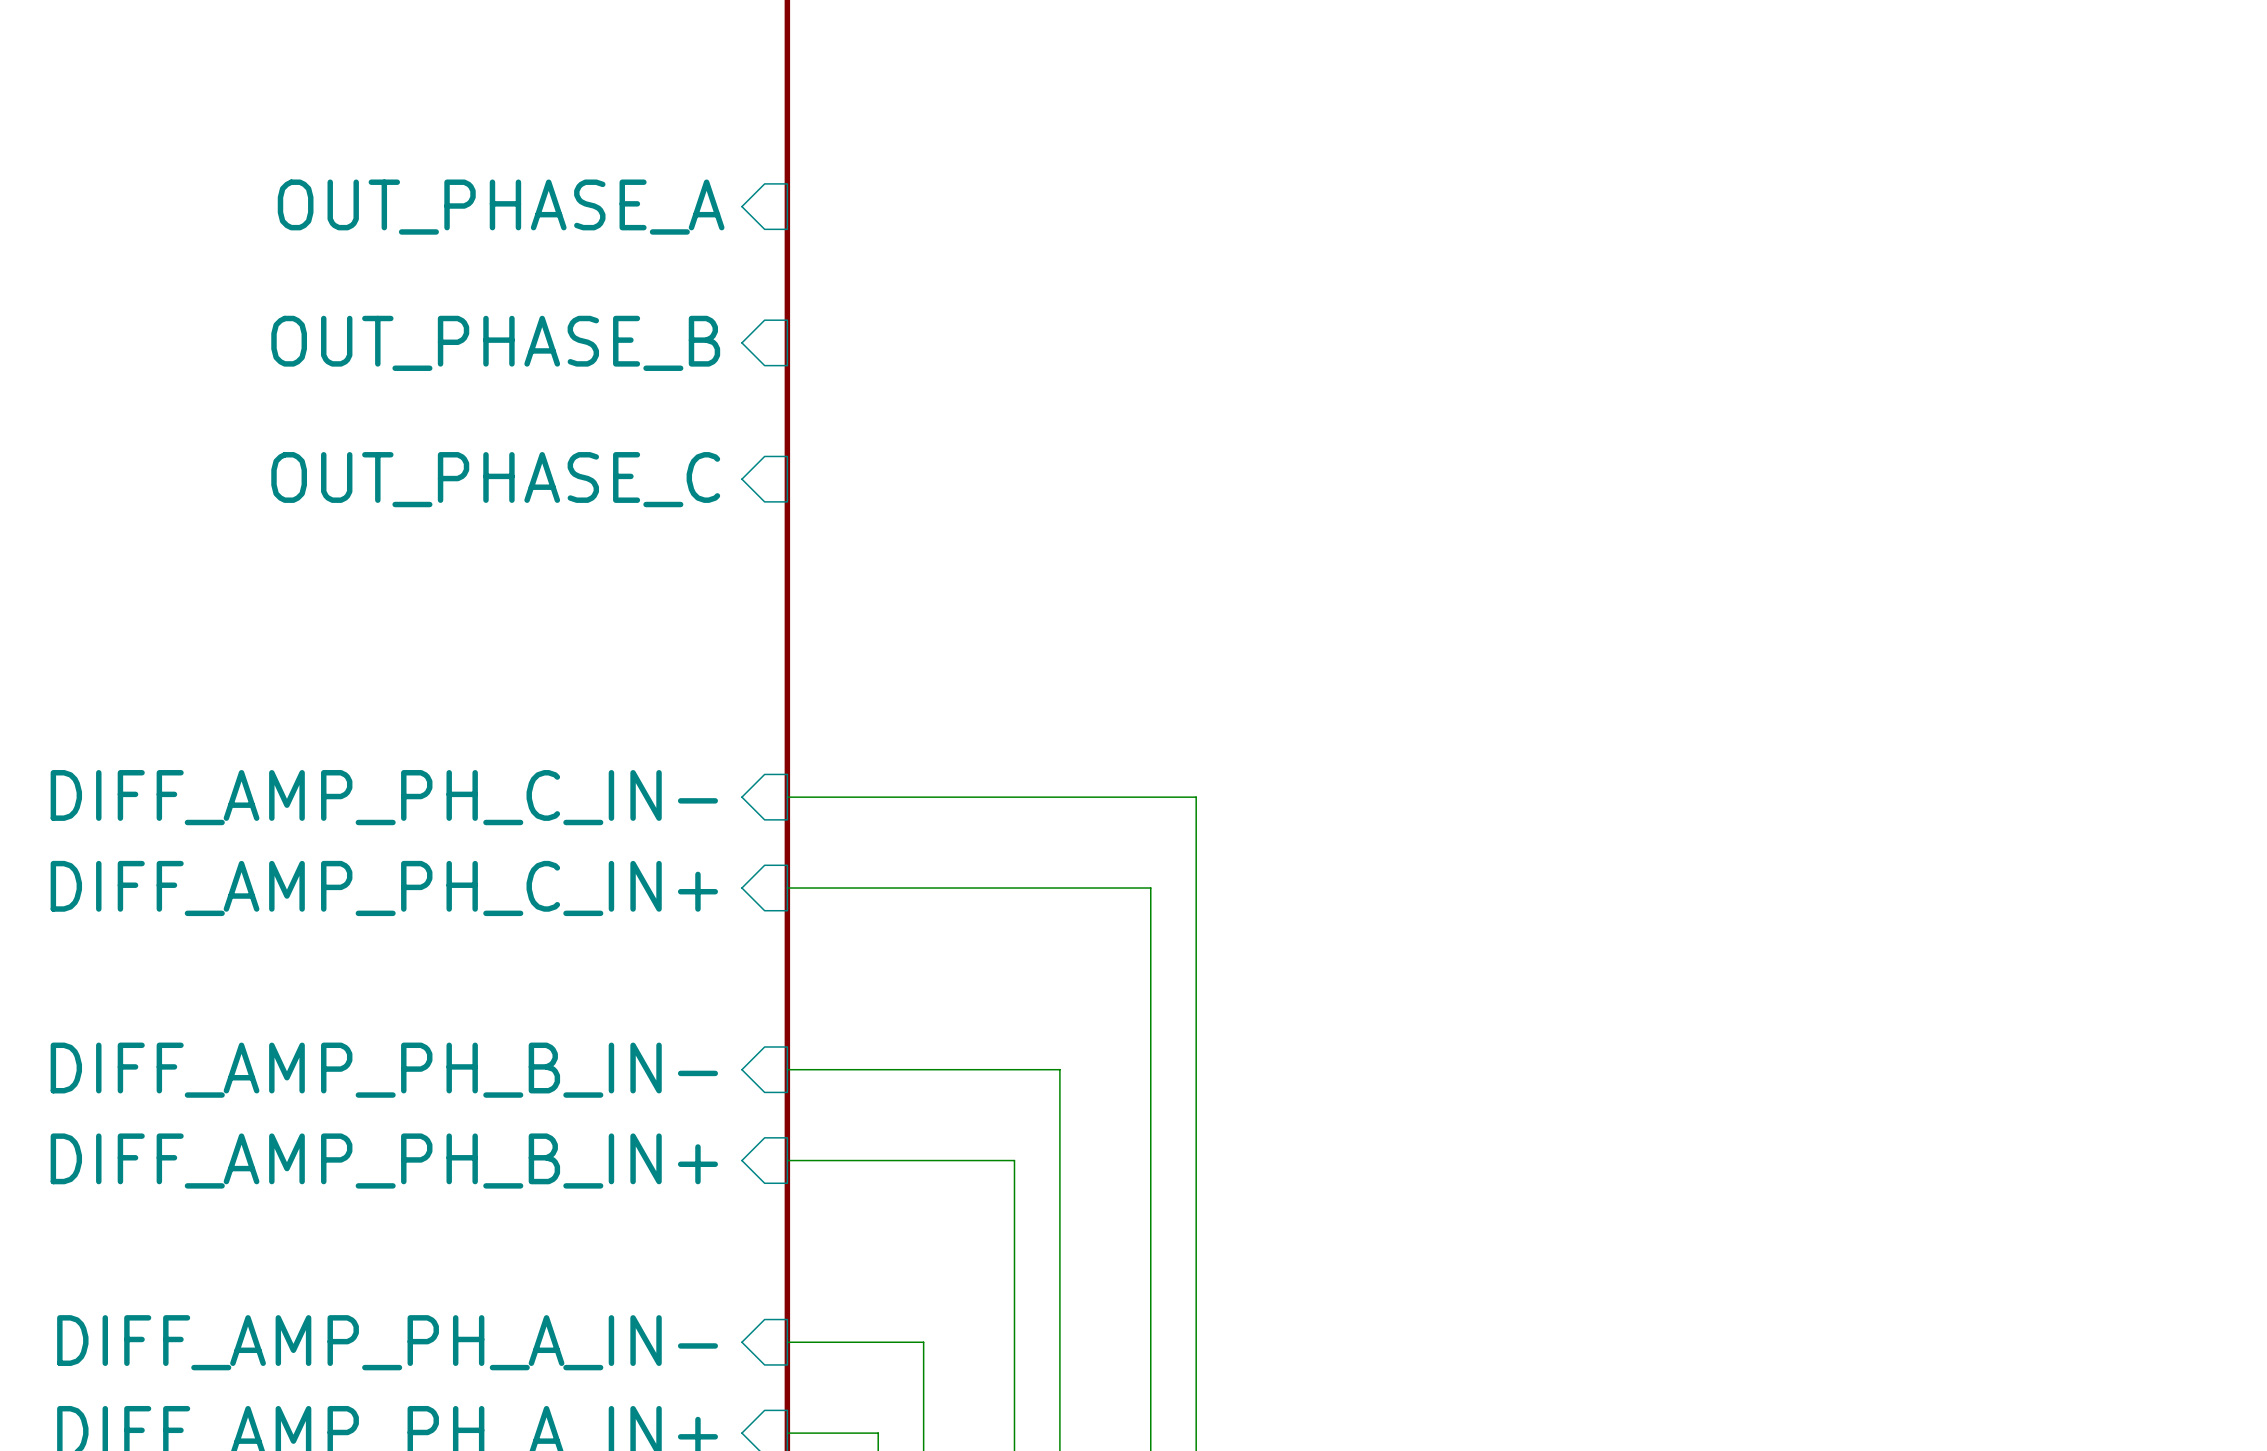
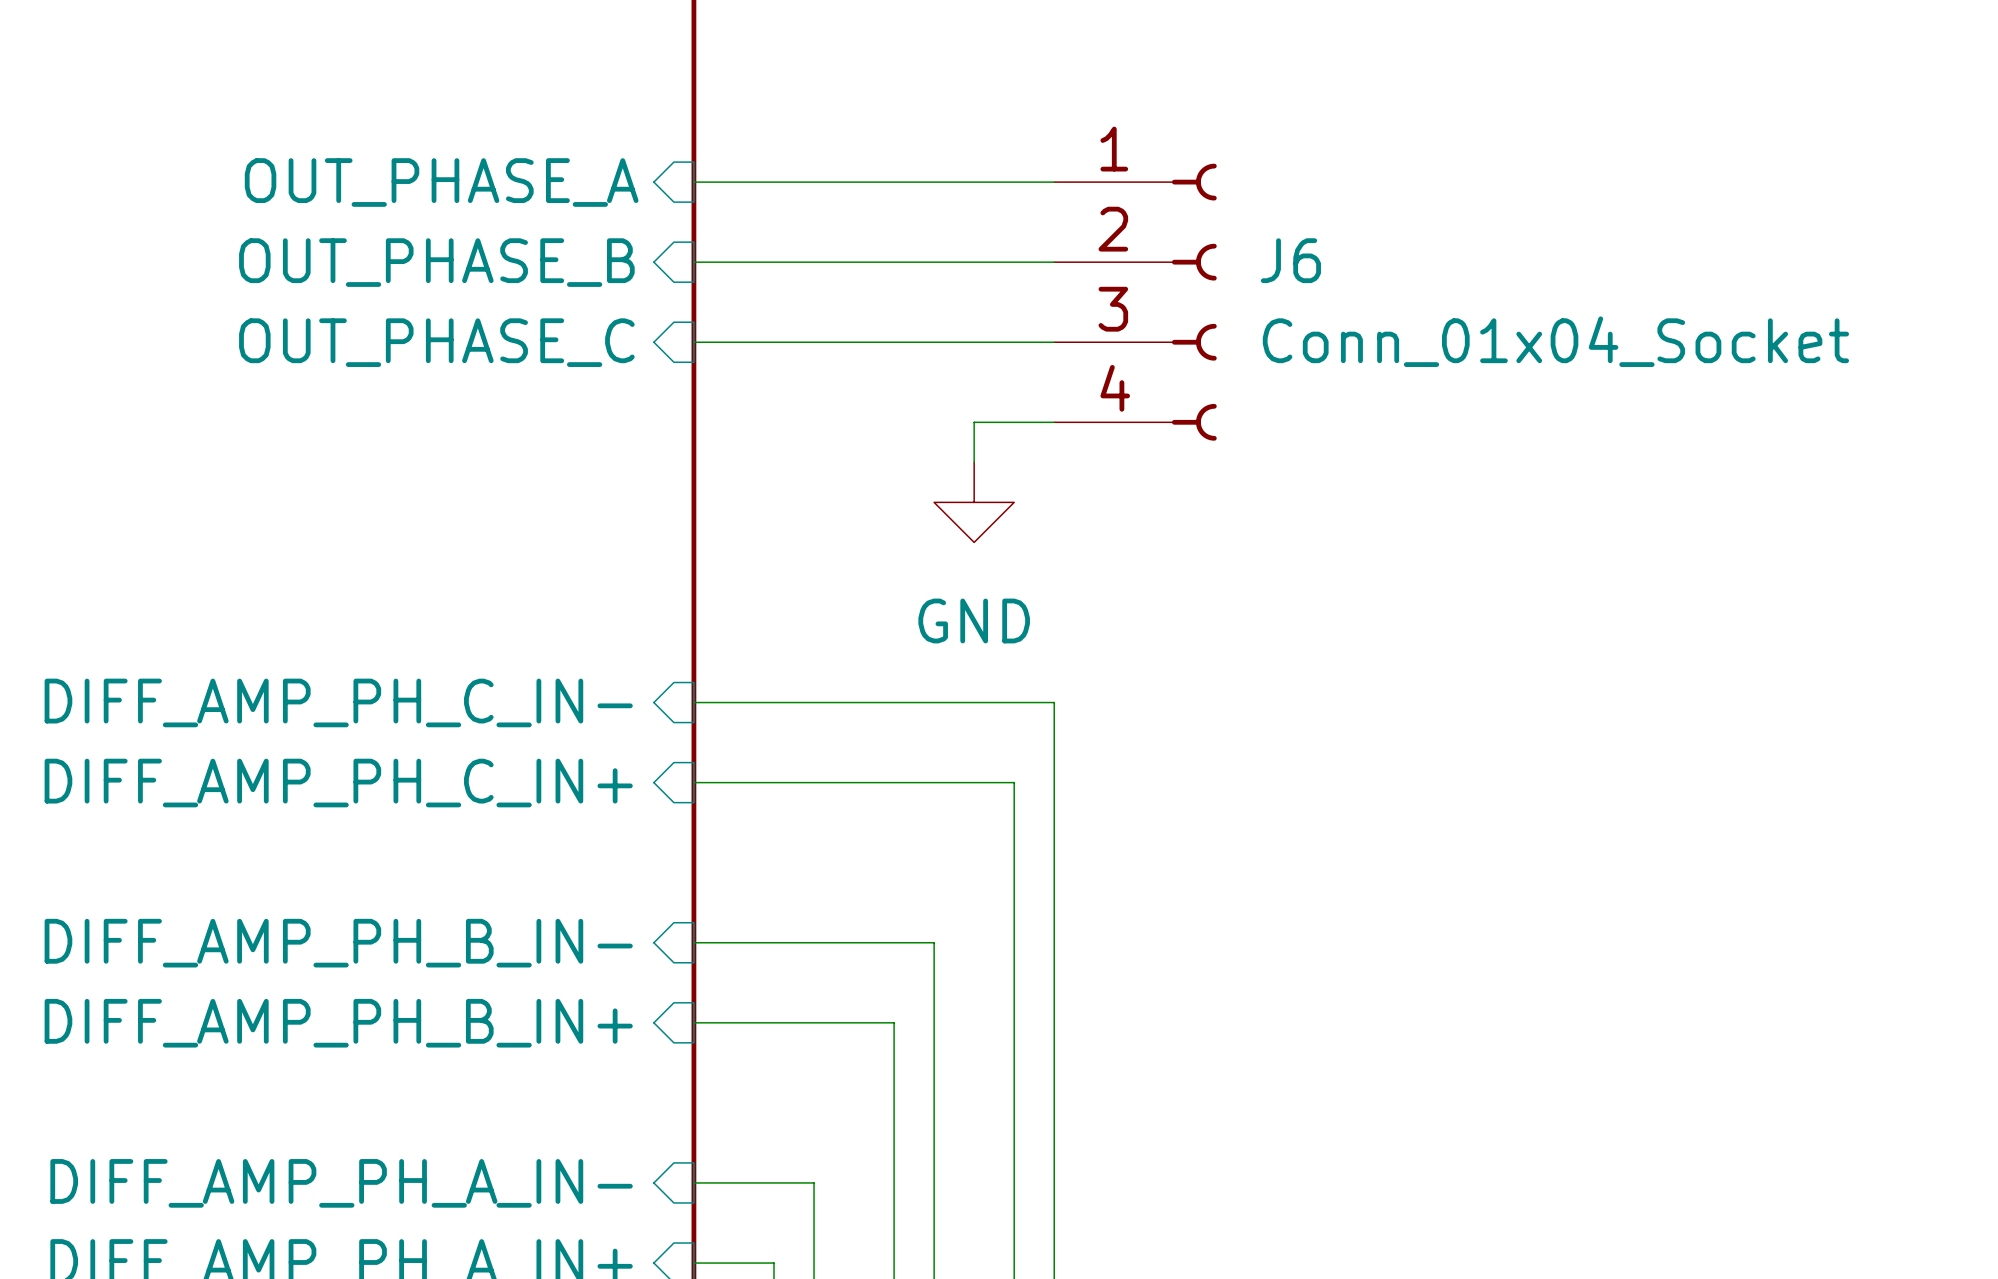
wire: none -> (693, 182) (1054, 182)
wire: none -> (693, 262) (1054, 262)
J6: none -> Conn_01x04_Socket (1135, 302)
sheet pin position: OUT_PHASE_B (495, 343) -> OUT_PHASE_B (436, 262)
wire: none -> (693, 342) (1054, 342)
sheet pin position: OUT_PHASE_C (495, 479) -> OUT_PHASE_C (436, 342)
wire: none -> (1054, 422) (974, 422) (974, 462)
power symbol: none -> GND (974, 502)

